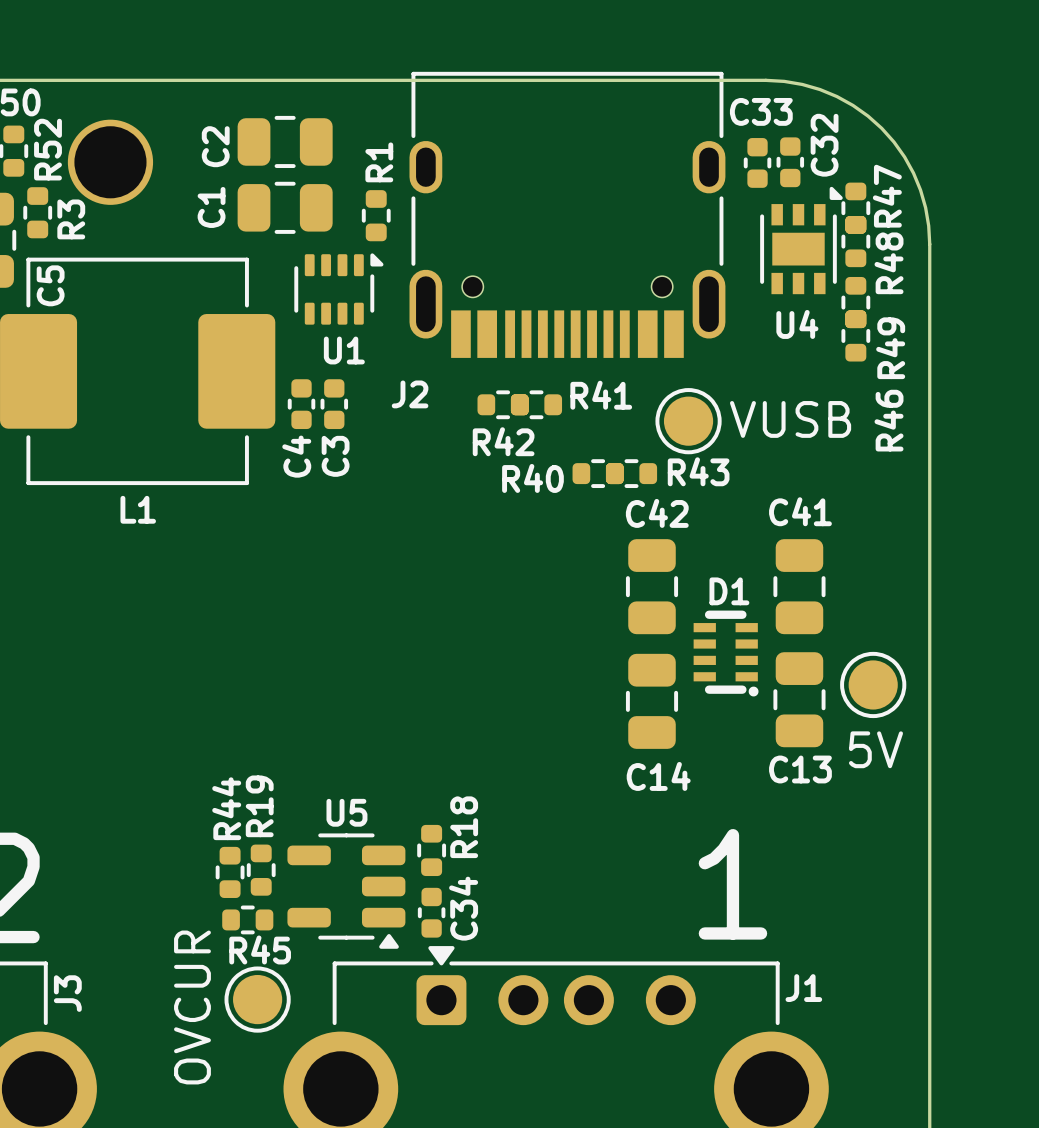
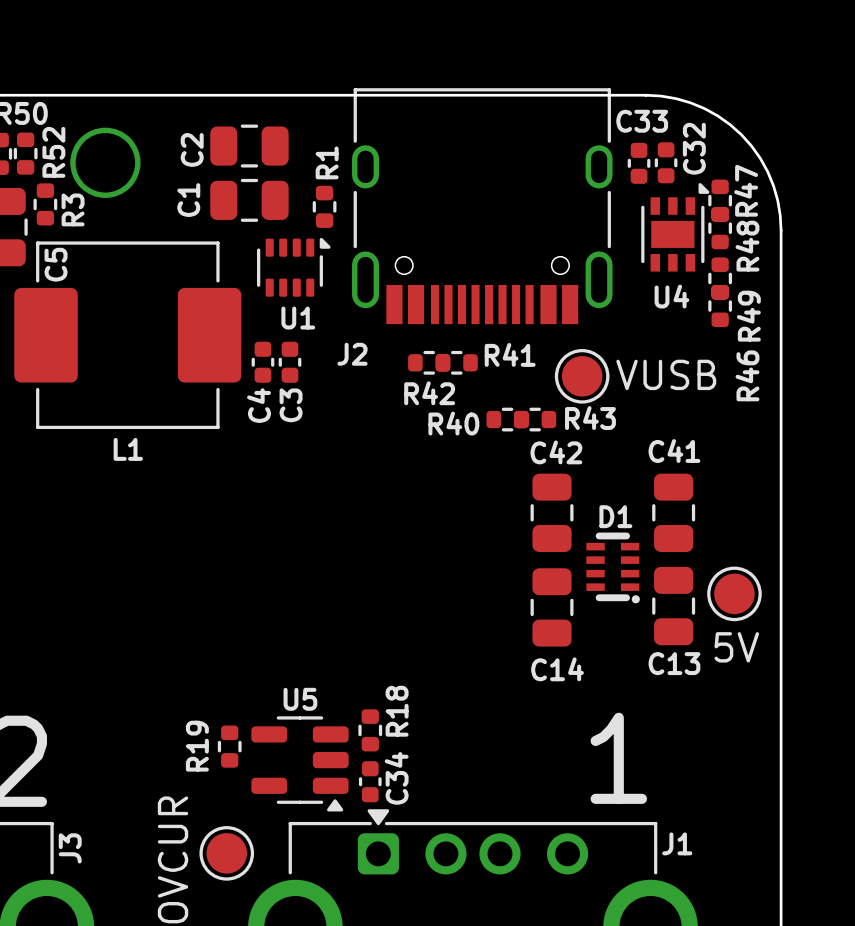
R19 name position: R19 (259, 806) -> R19 (197, 746)
R44: (230, 872) -> none
R45: (247, 919) -> none

